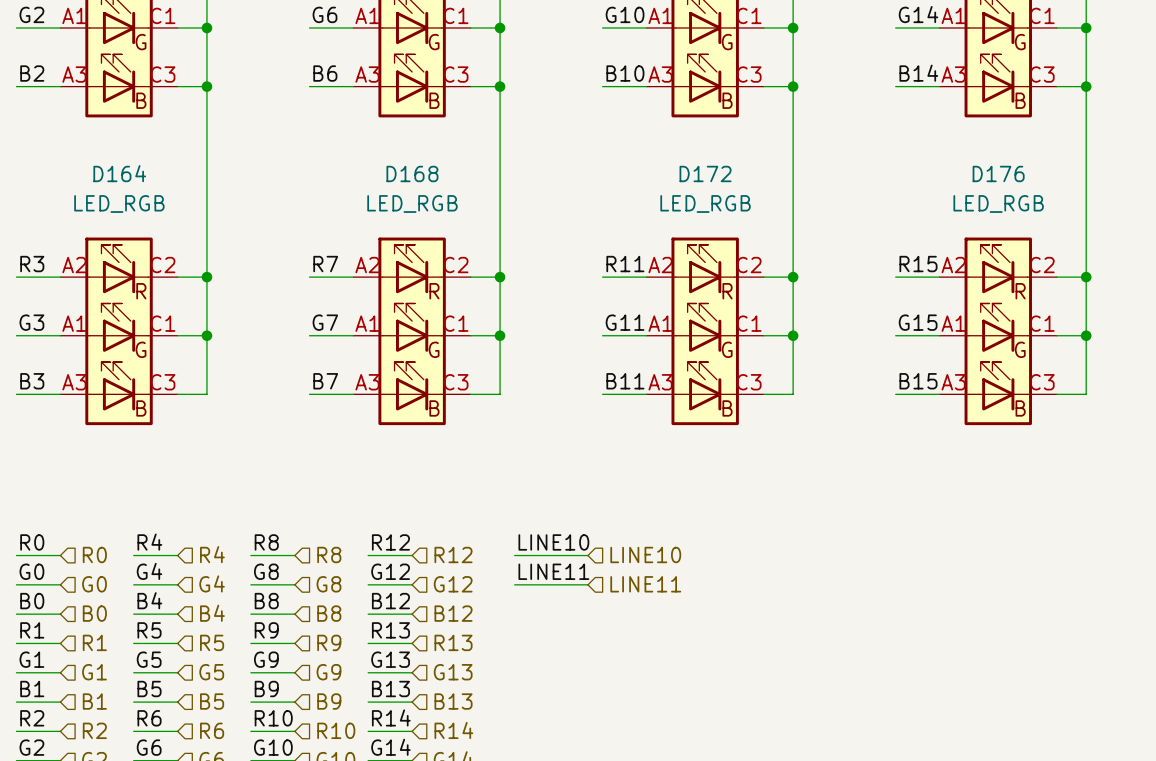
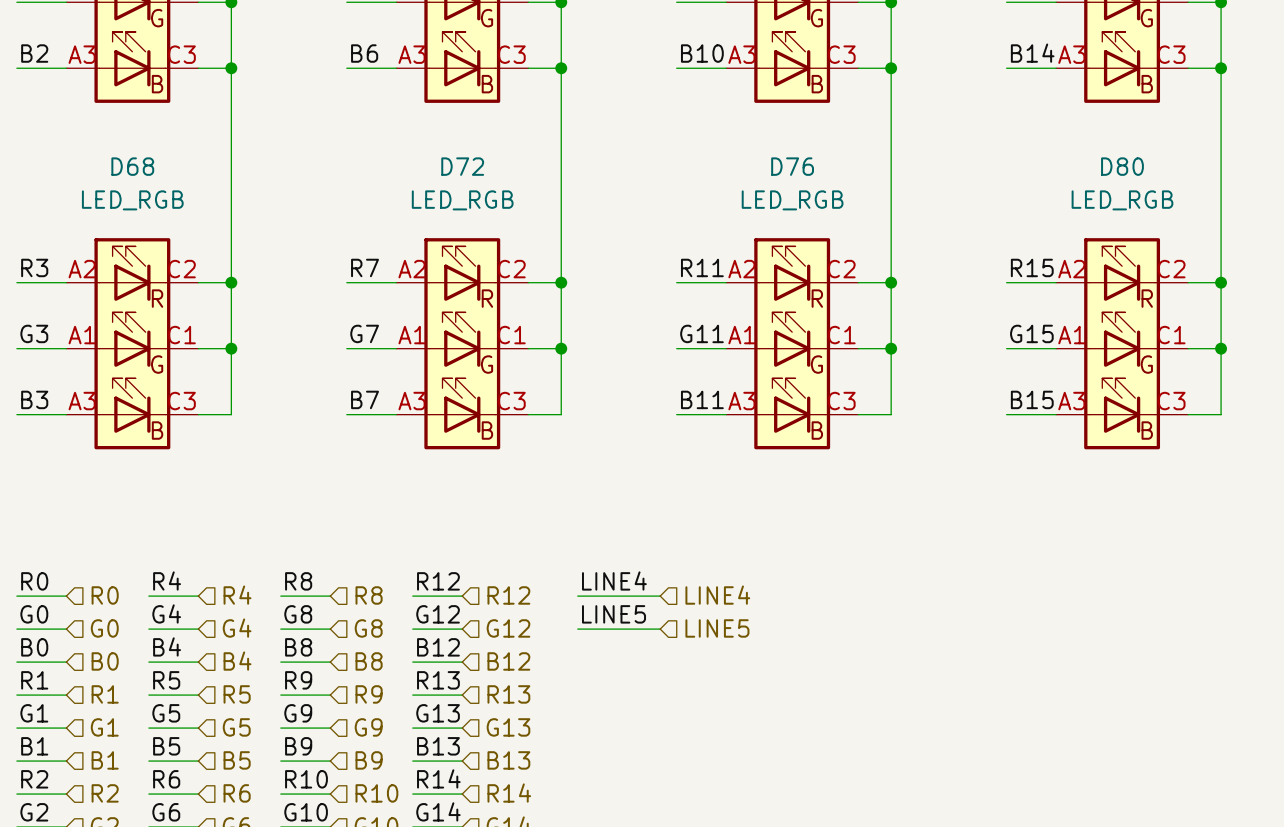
D164 name: D164 (119, 173) -> D68 (132, 166)
D168 name: D168 (412, 173) -> D72 (462, 166)
D172 name: D172 (705, 173) -> D76 (792, 166)
D176 name: D176 (998, 173) -> D80 (1122, 166)
label: LINE10 (553, 542) -> LINE4 (614, 580)
hierarchical label: LINE10 (645, 554) -> LINE4 (717, 595)
label: LINE11 (553, 571) -> LINE5 (614, 614)
hierarchical label: LINE11 (645, 584) -> LINE5 (717, 628)

